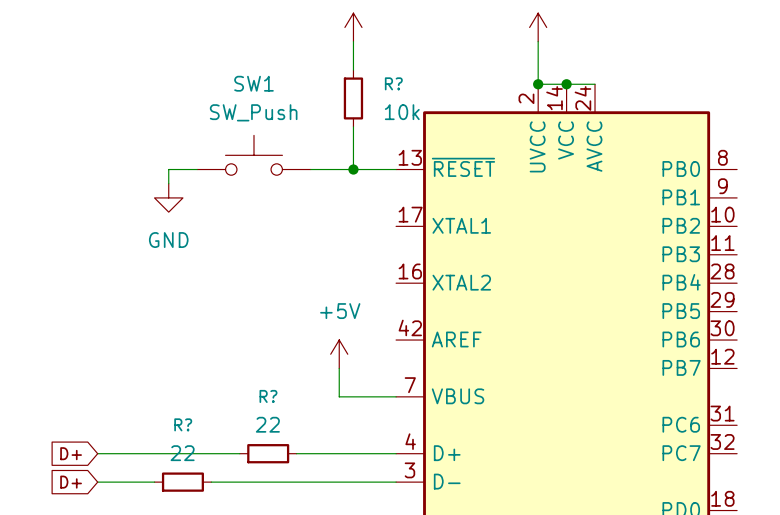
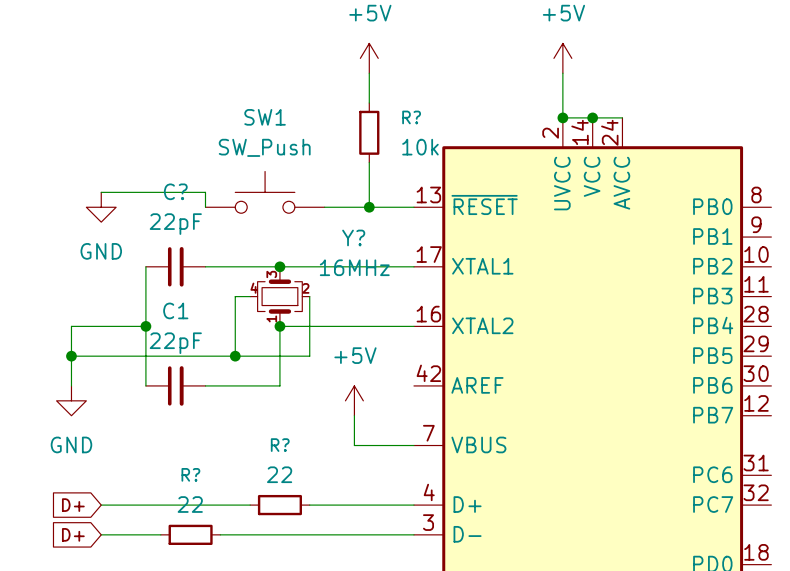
wire: (197, 169) (168, 169) (168, 183) -> (205, 207) (205, 192) (101, 192)
power symbol position: GND (168, 197) -> GND (101, 207)
wire: none -> (145, 266) (145, 385)
C?: none -> 22pF (175, 266)
wire: none -> (205, 266) (413, 266)
junction: none -> (279, 266)
wire: none -> (250, 296) (235, 296) (235, 356)
Y?: none -> 16MHz (279, 296)
wire: none -> (309, 296) (309, 356) (71, 356)
wire: none -> (145, 326) (71, 326) (71, 385)
junction: none -> (145, 326)
junction: none -> (279, 326)
wire: none -> (413, 326) (279, 326) (279, 385) (205, 385)
junction: none -> (71, 356)
junction: none -> (235, 356)
C1: none -> 22pF (175, 385)
power symbol: none -> GND (71, 400)

